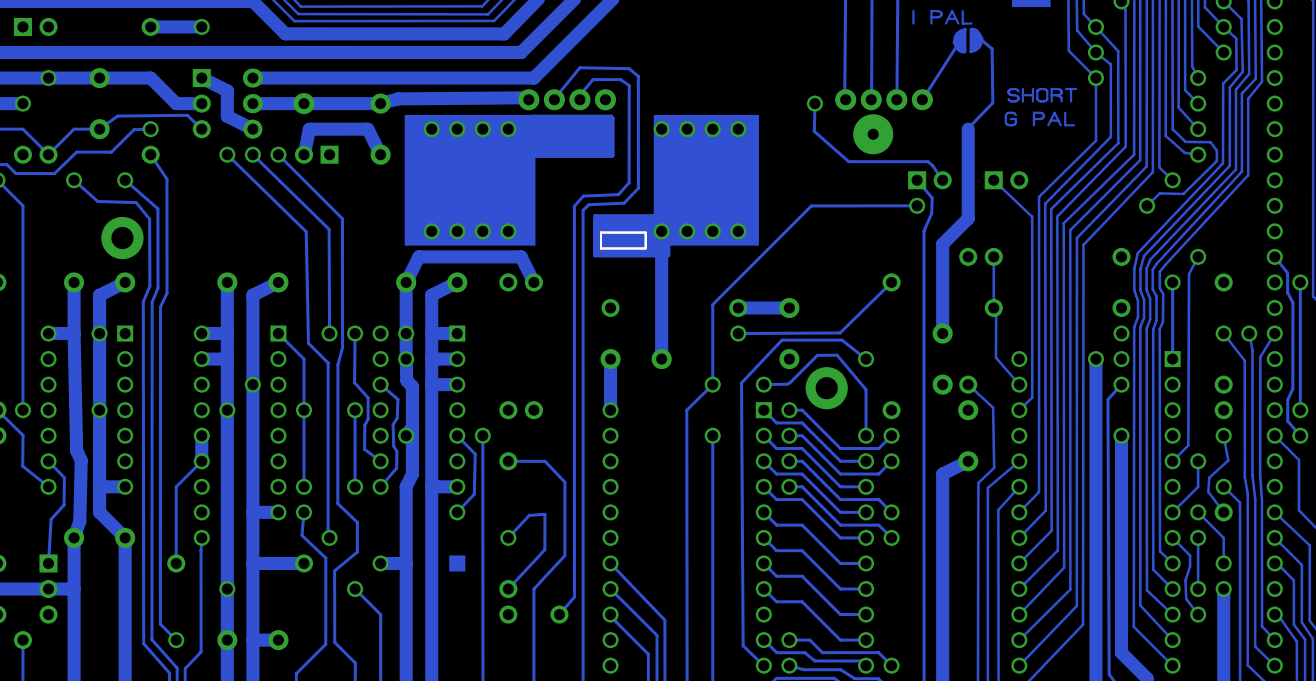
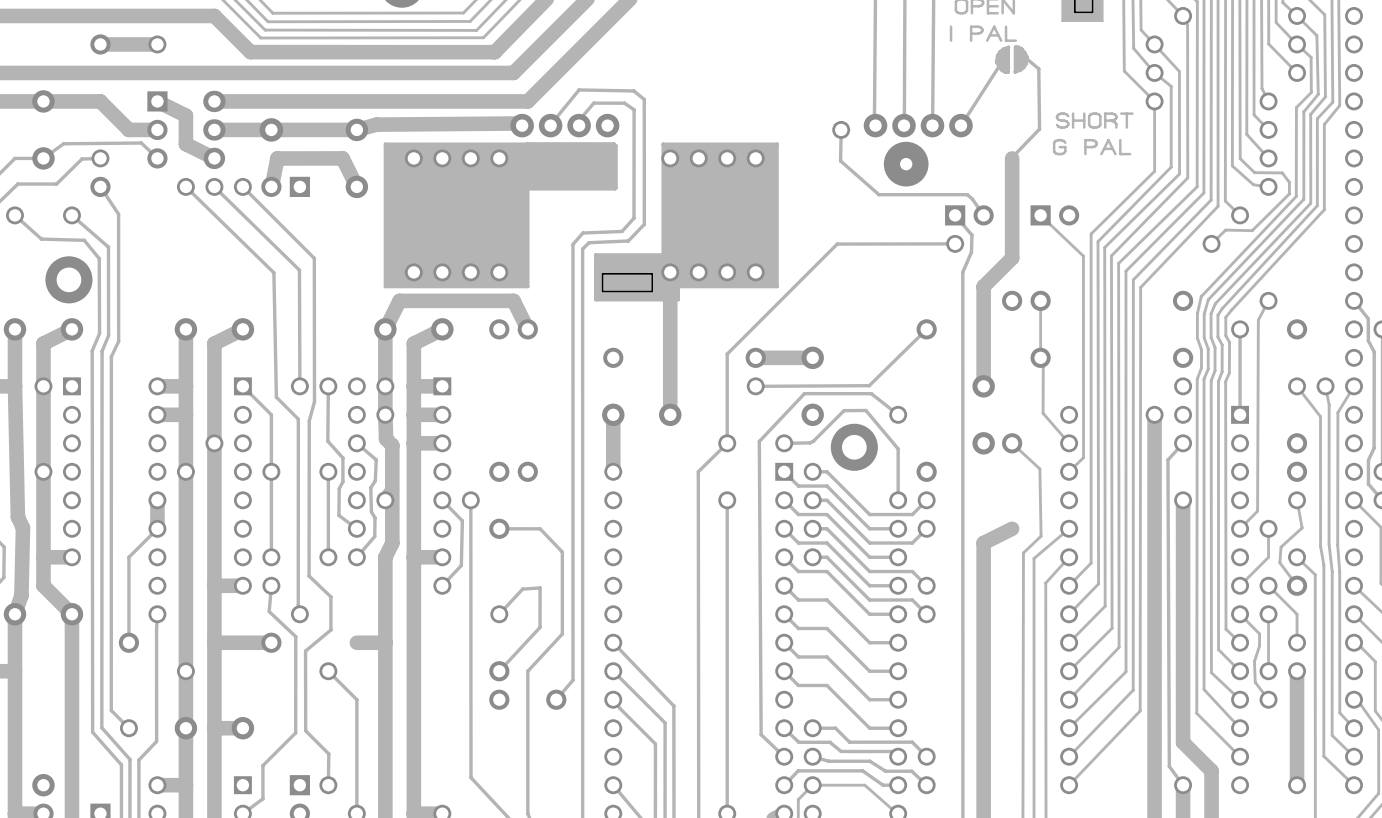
via: (968, 410) -> none
via: (968, 461) -> none
drawing: [449, 555, 466, 572] -> none
via: (380, 563) -> none

